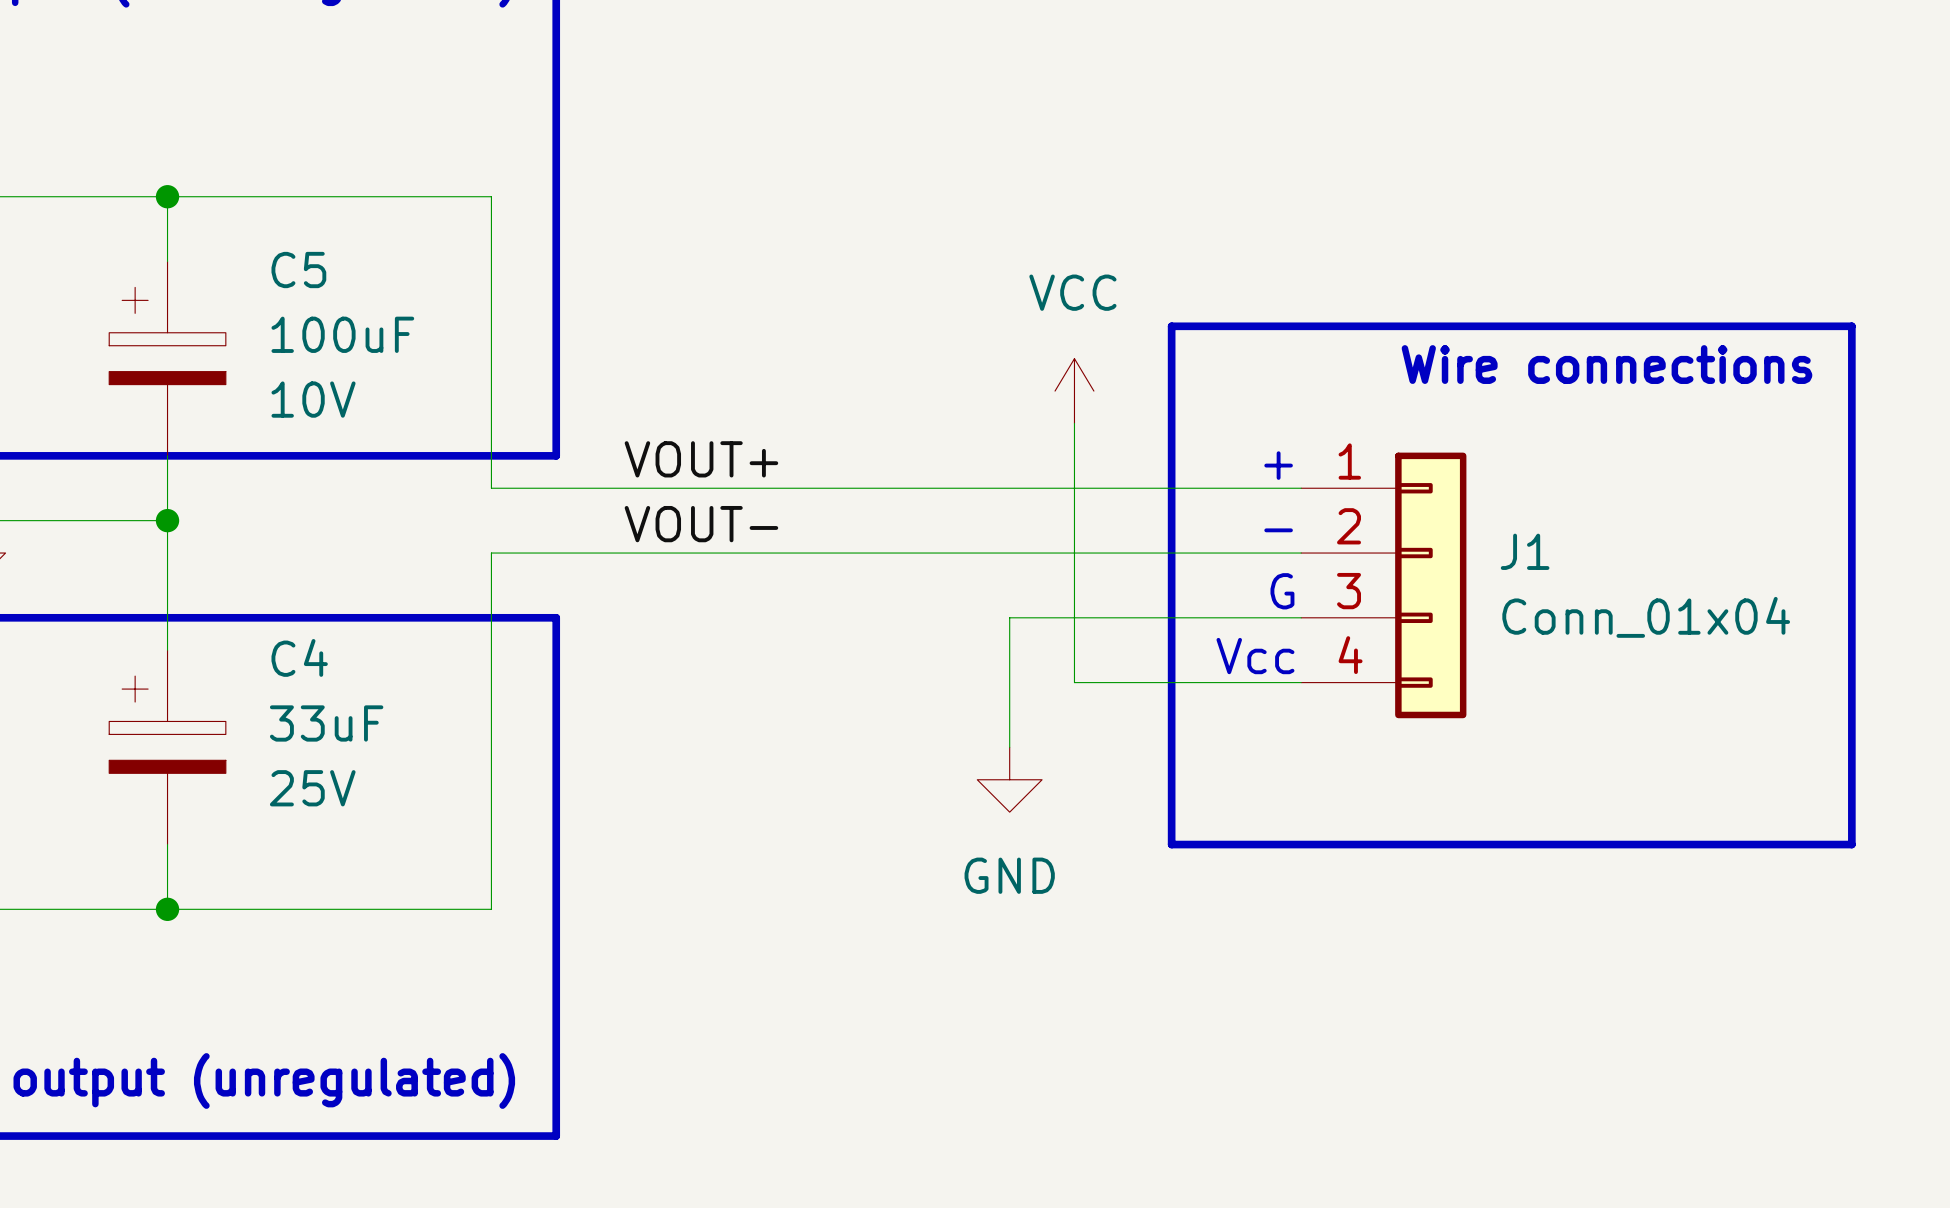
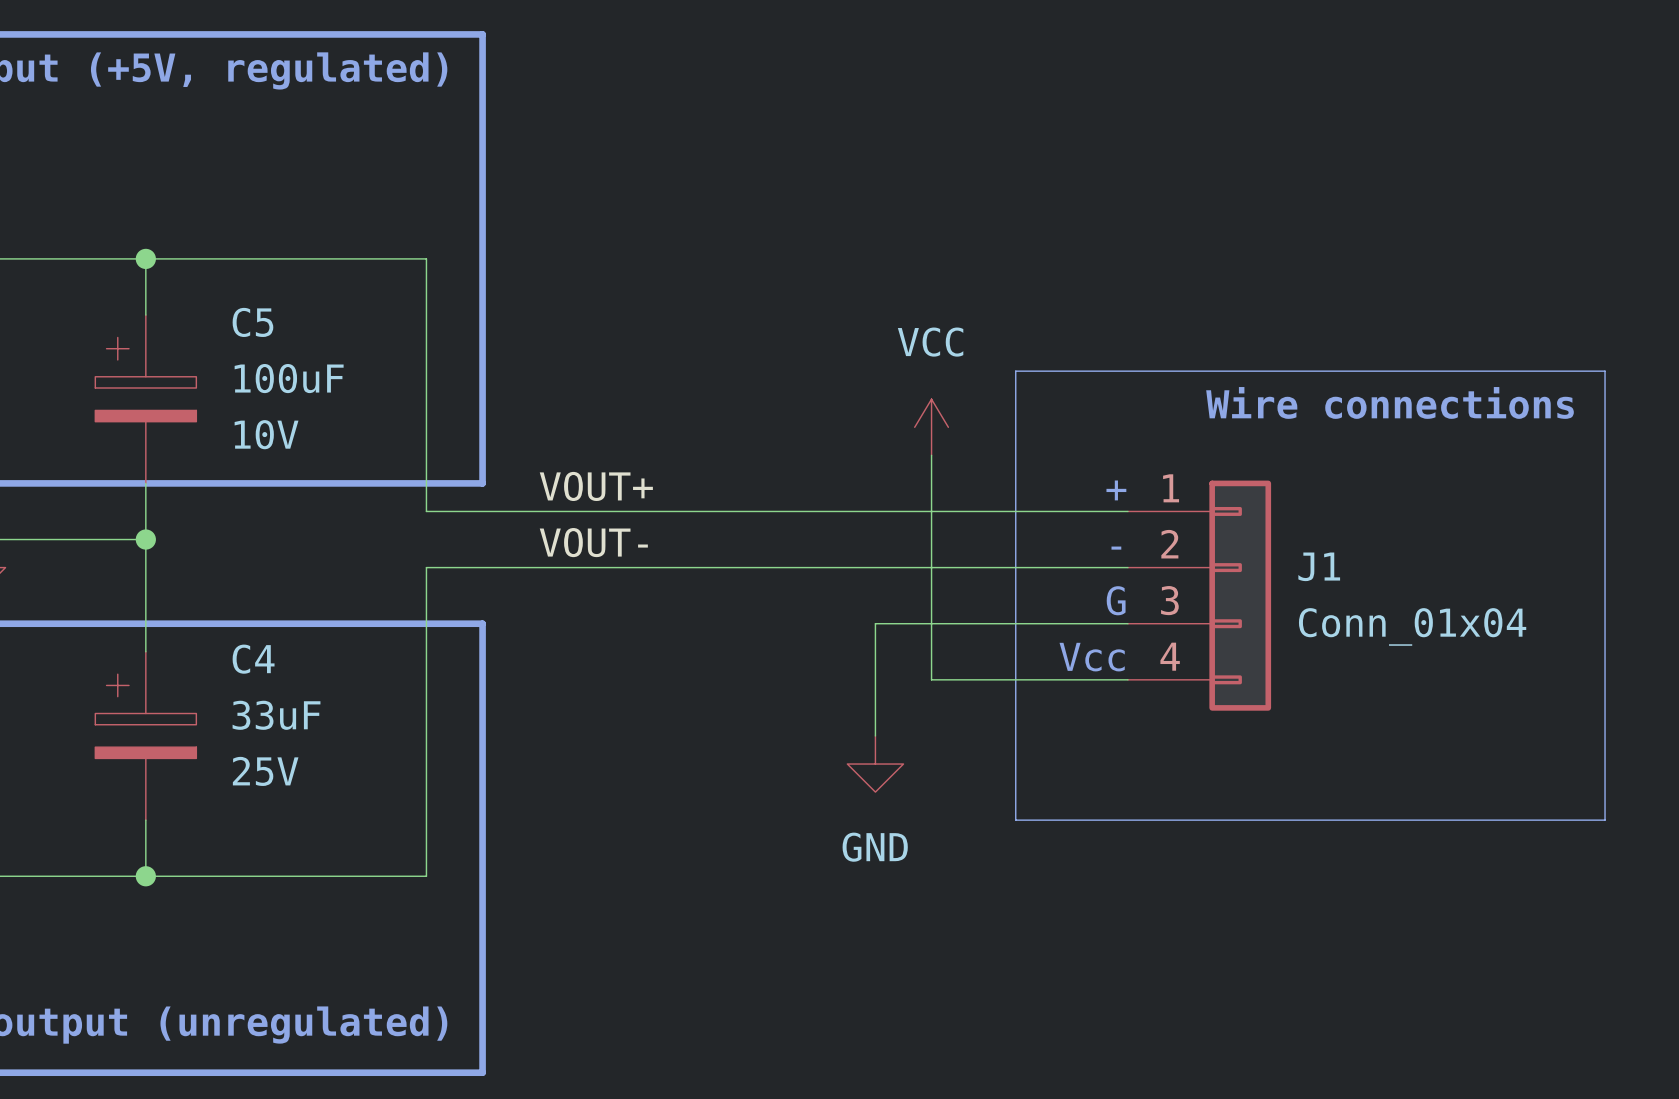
line width: thick (1171, 326) (1851, 326) (1851, 844) (1171, 844) (1171, 326) -> thin (1015, 371) (1605, 371) (1605, 820) (1015, 820) (1015, 371)

